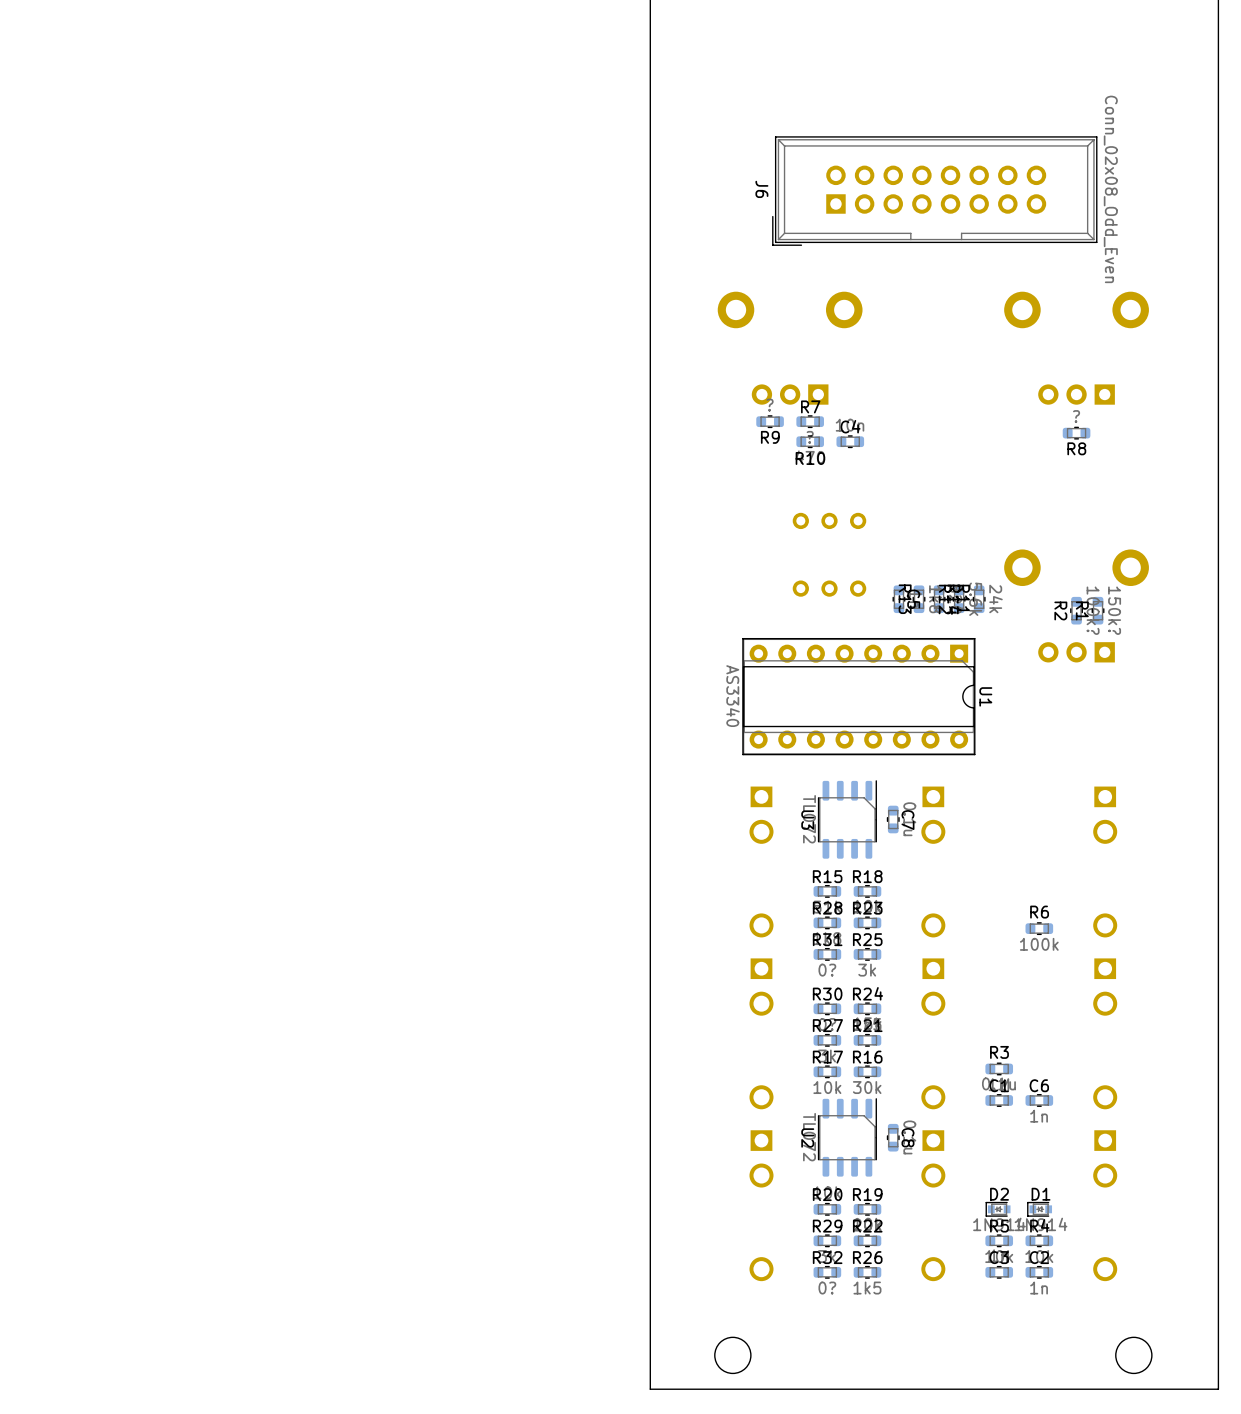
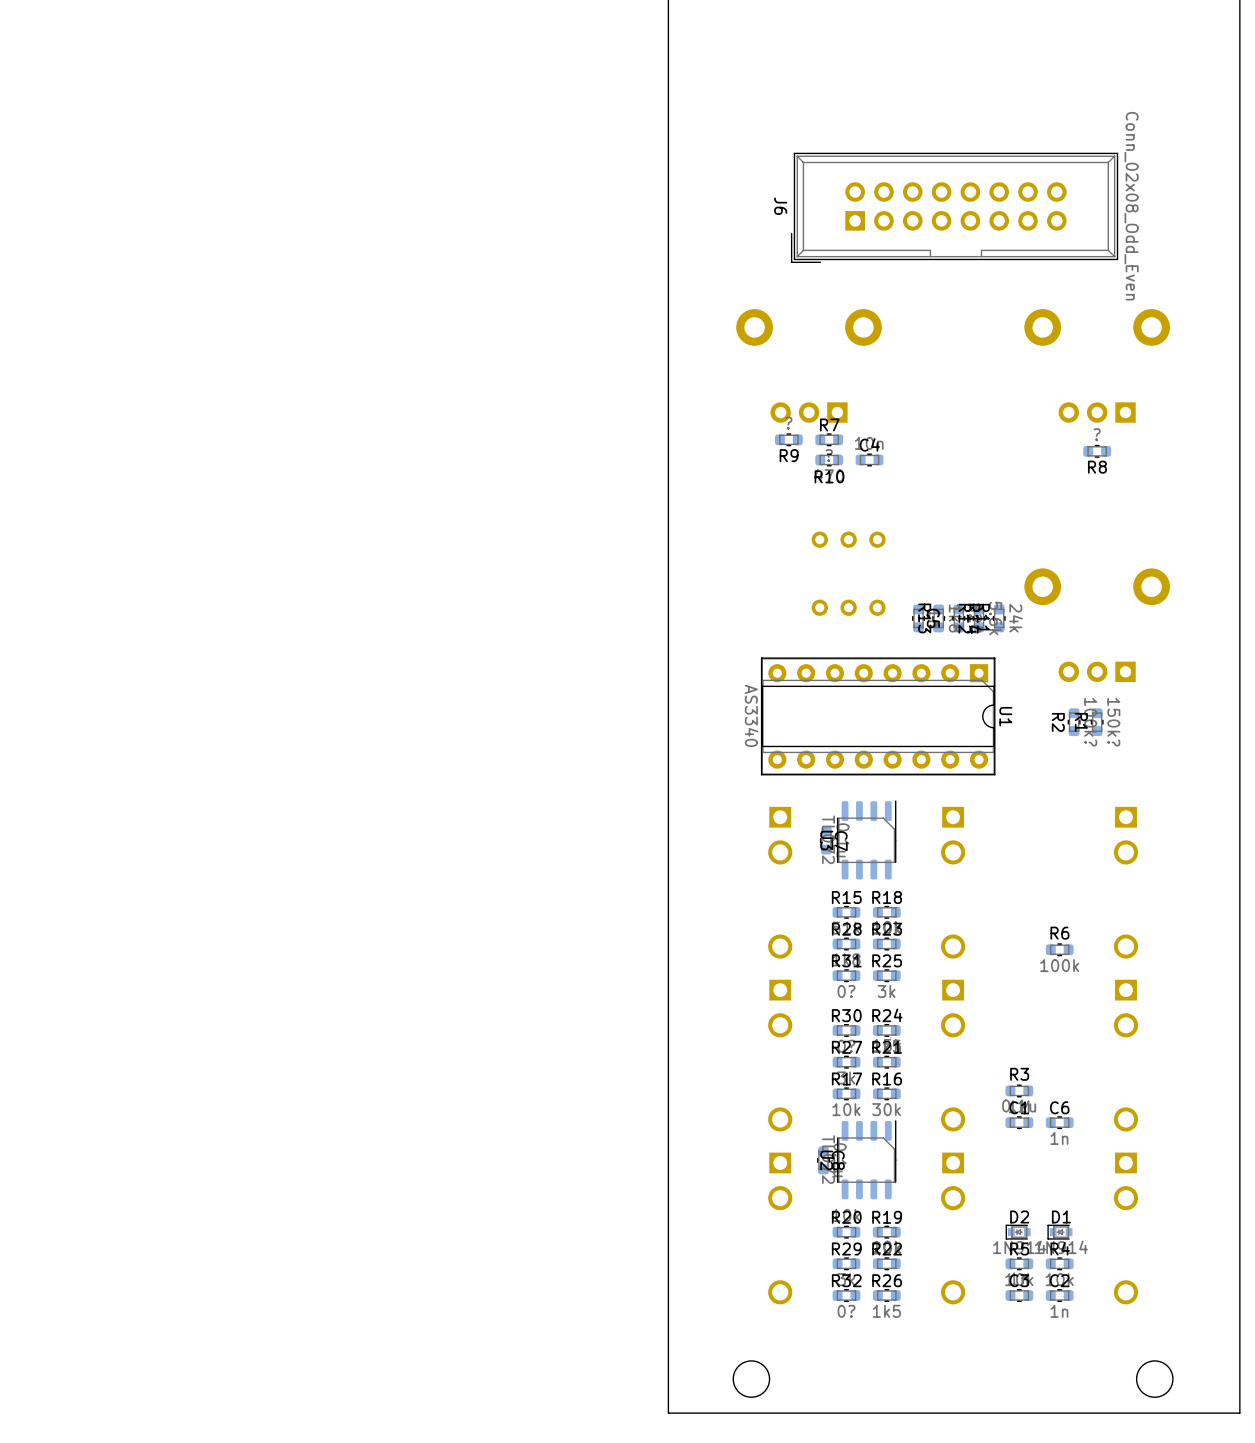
R2 position: (1076, 610) -> (1074, 722)
R1 position: (1098, 610) -> (1097, 722)
C7 position: (893, 819) -> (826, 840)
C8 position: (893, 1137) -> (823, 1160)

